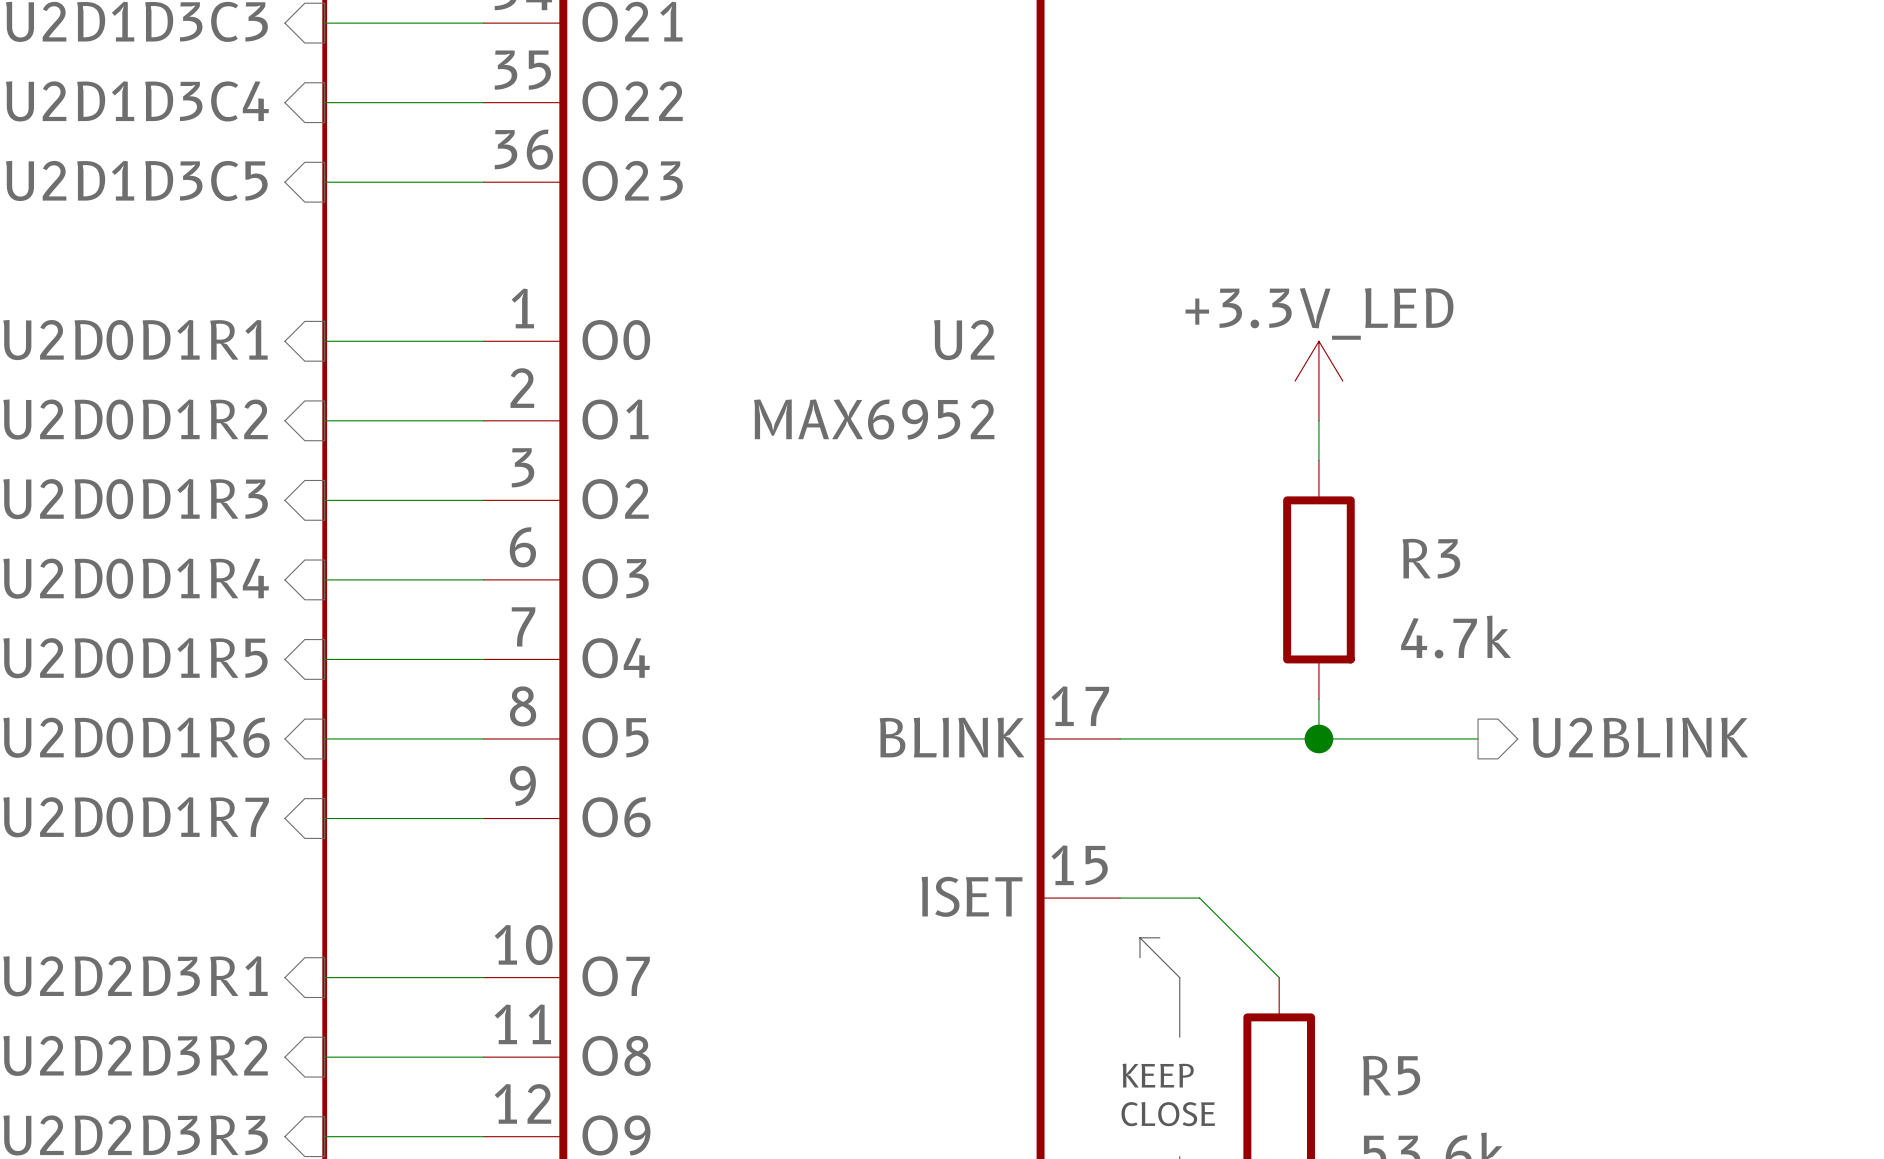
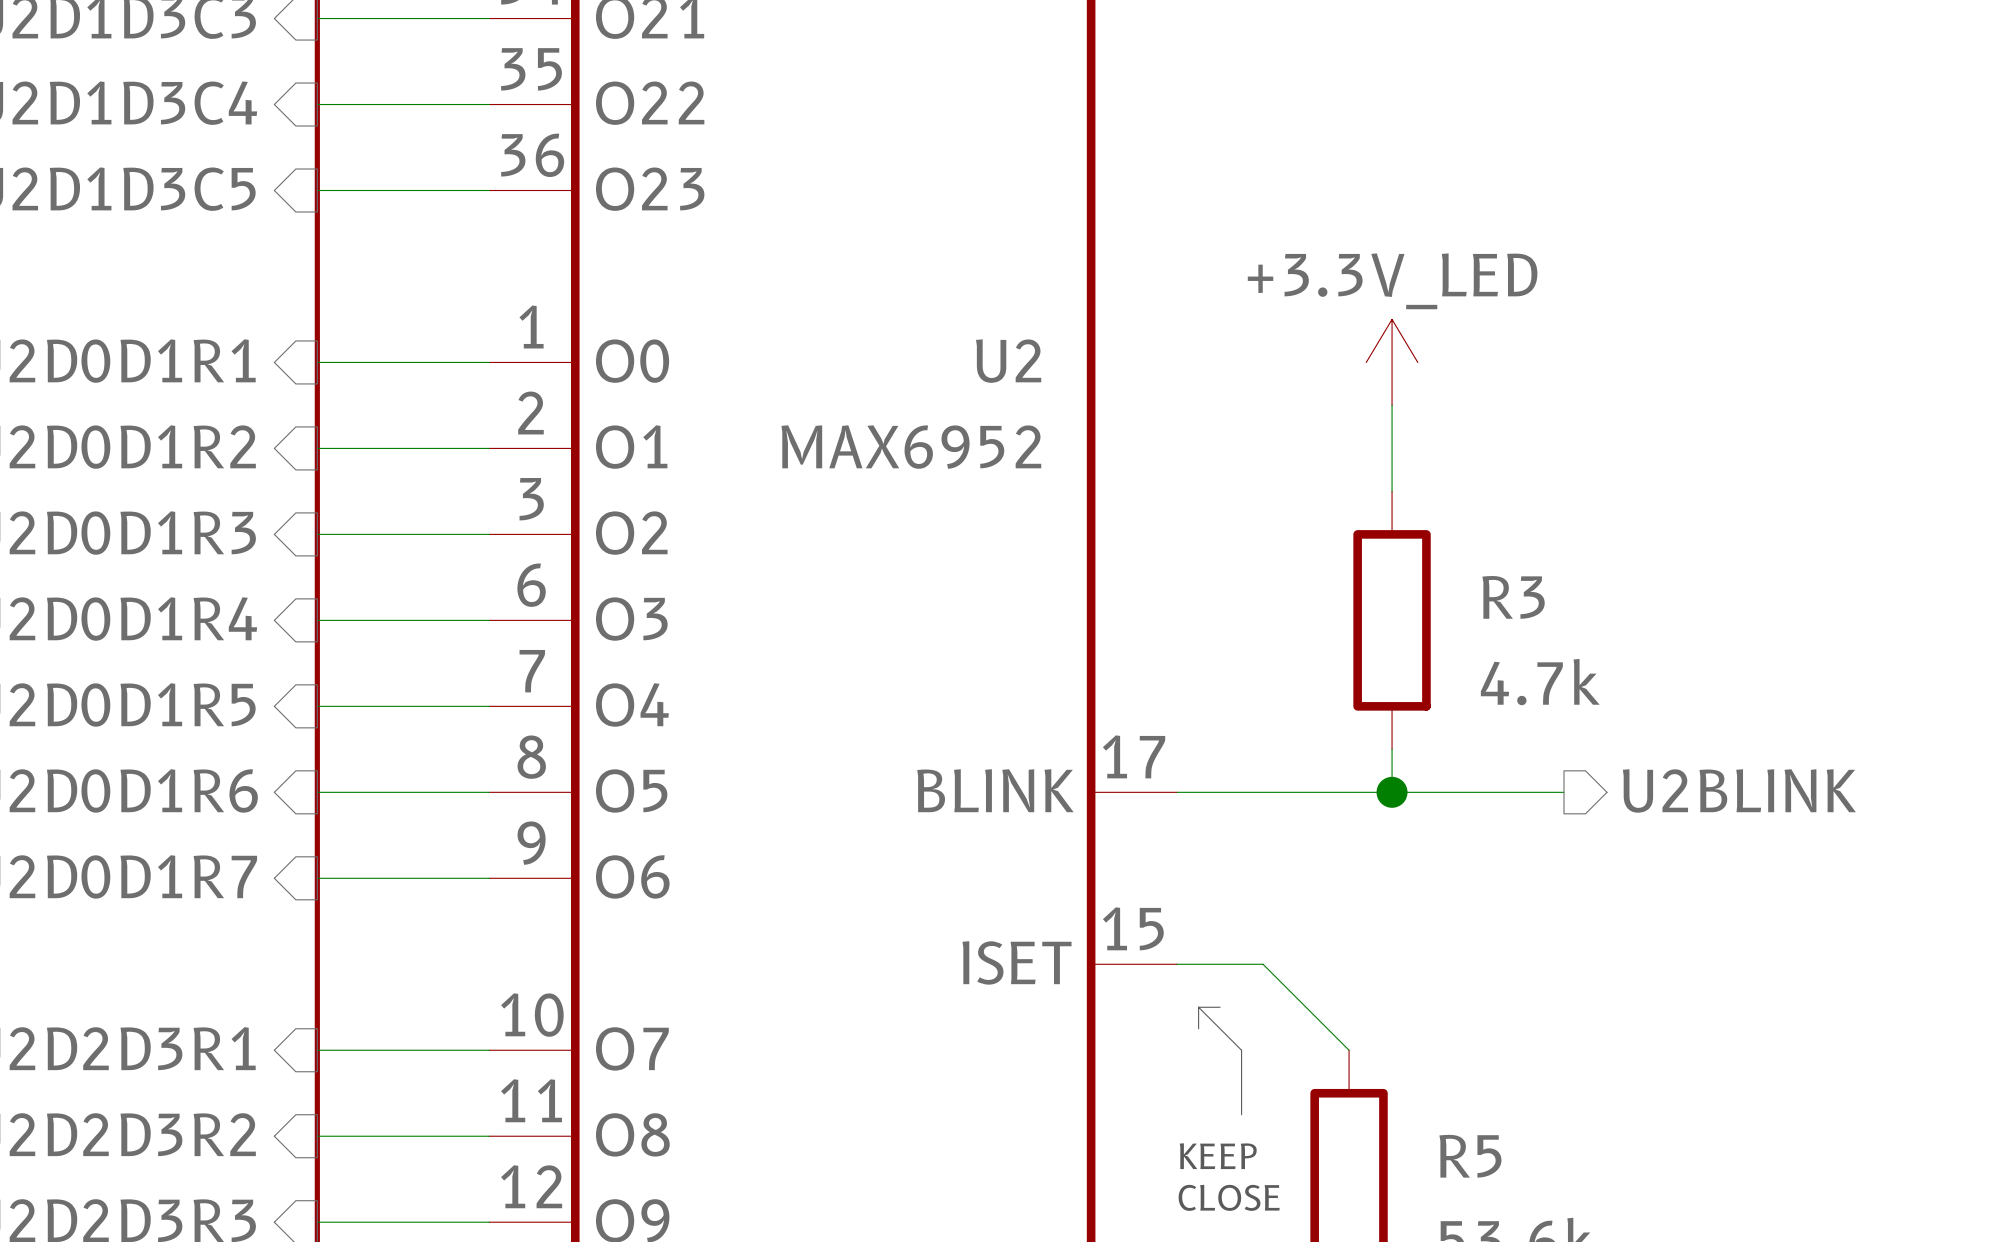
power symbol text position: +3.3V_LED (1319, 313) -> +3.3V_LED (1392, 281)
power symbol position: +3.3V_LED (1318, 381) -> +3.3V_LED (1392, 362)

